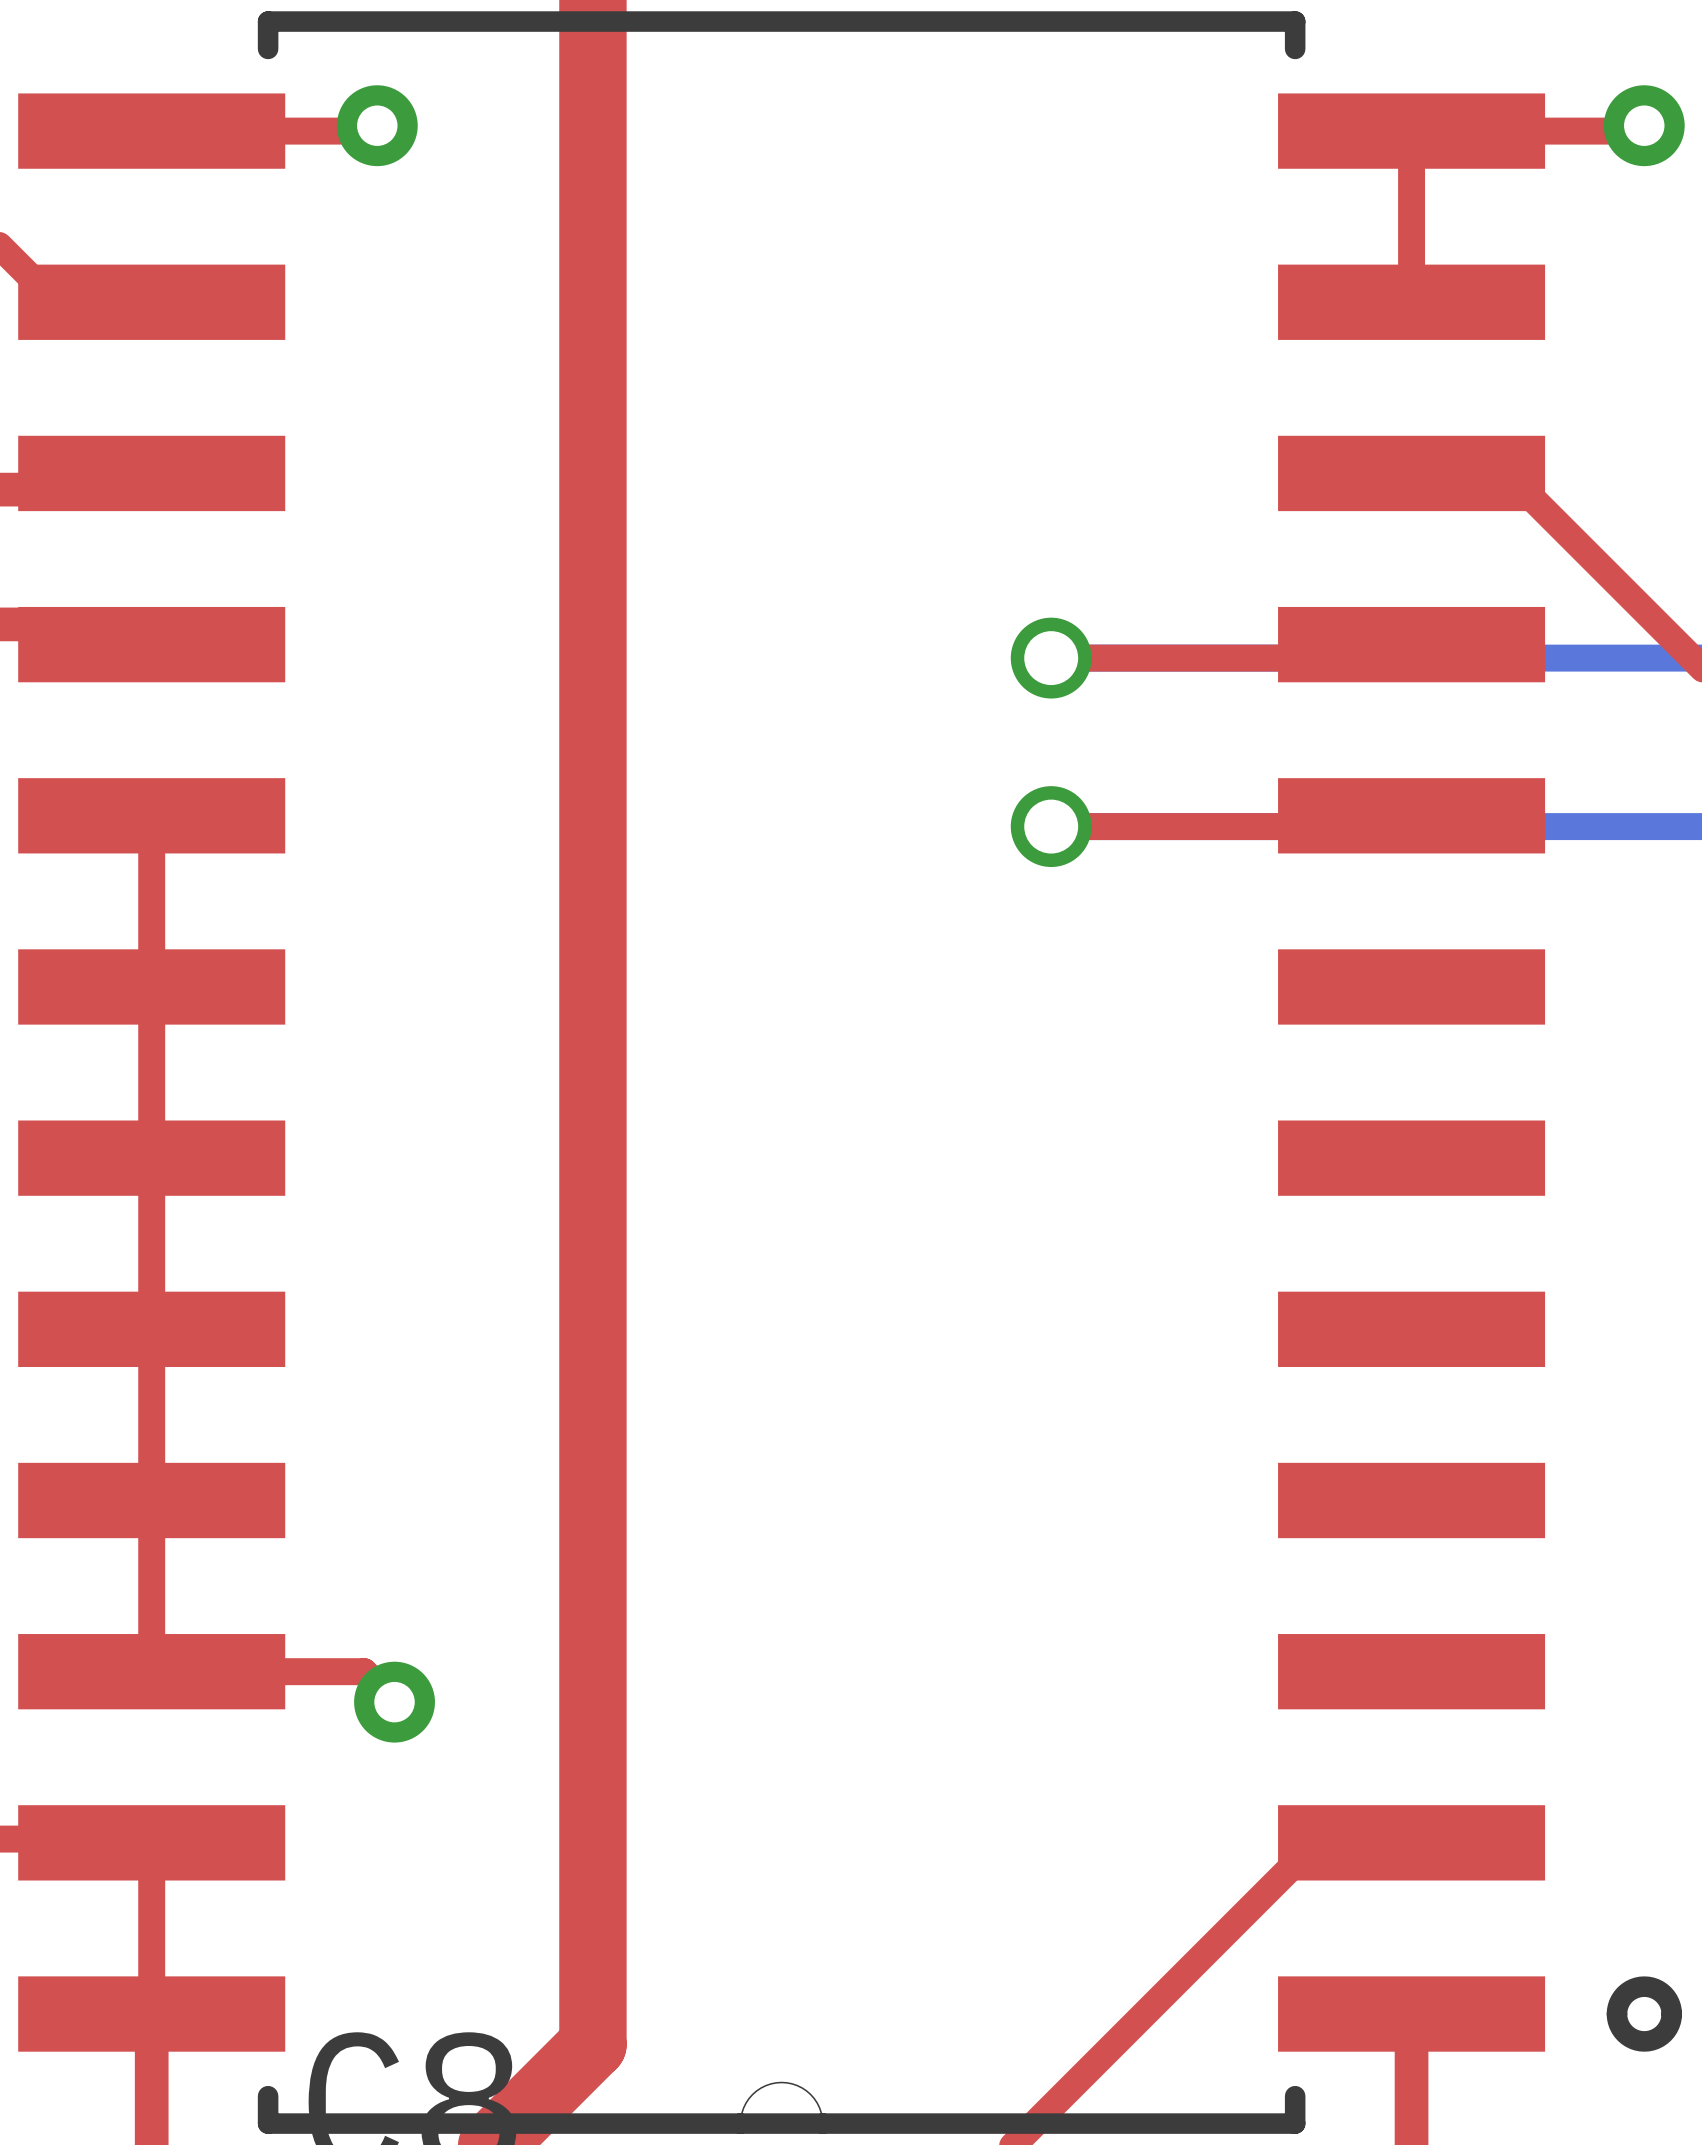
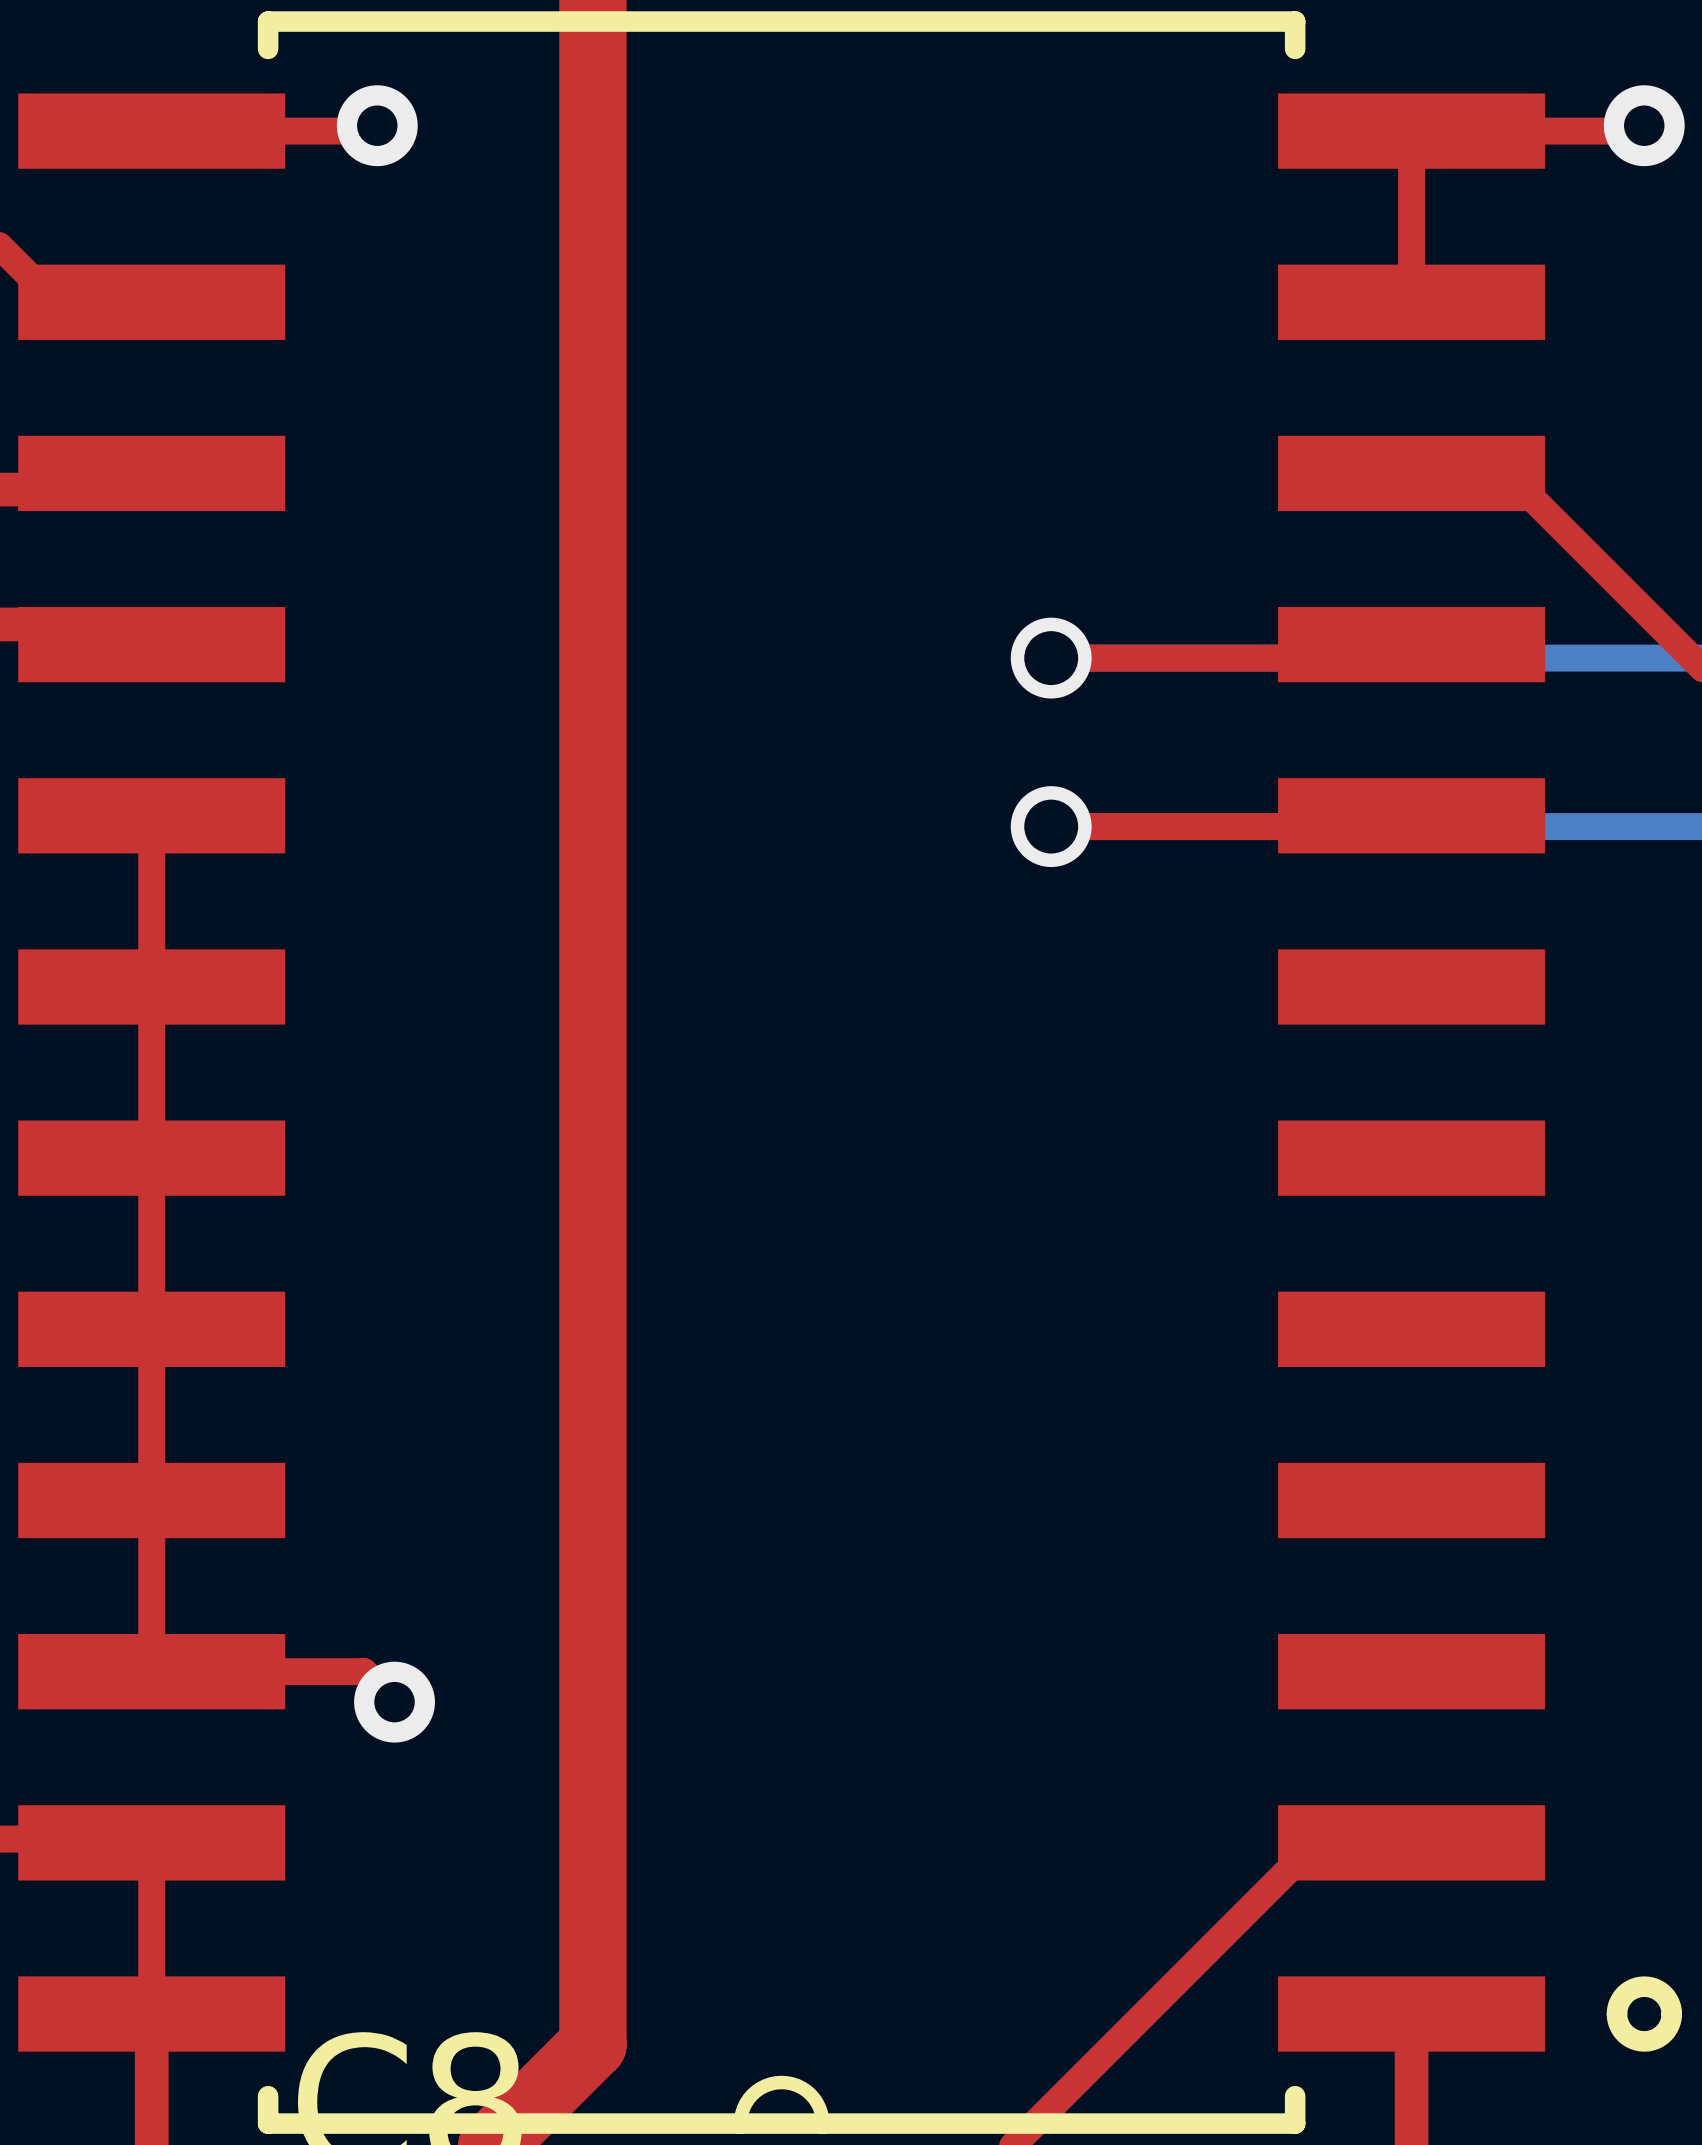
part footprint: [18, 11, 1683, 2134] -> [18, 11, 1683, 2134]

